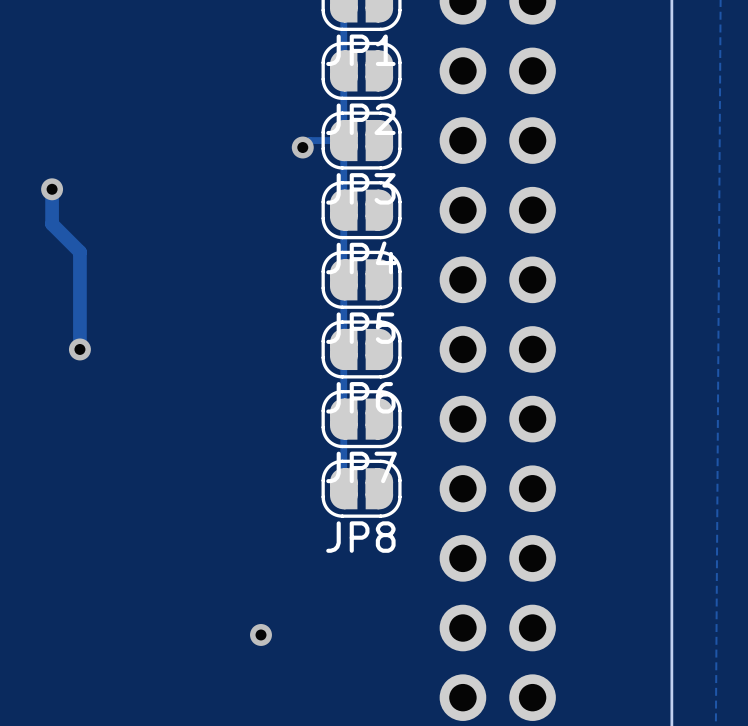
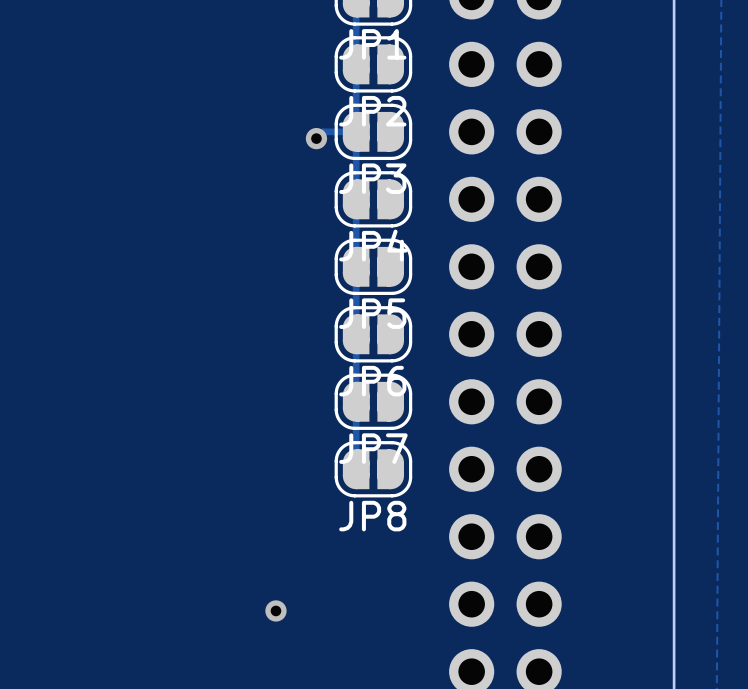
track: (52, 189) (52, 224) (79, 251) (79, 349) -> none
via: (52, 189) -> none
via: (79, 349) -> none

